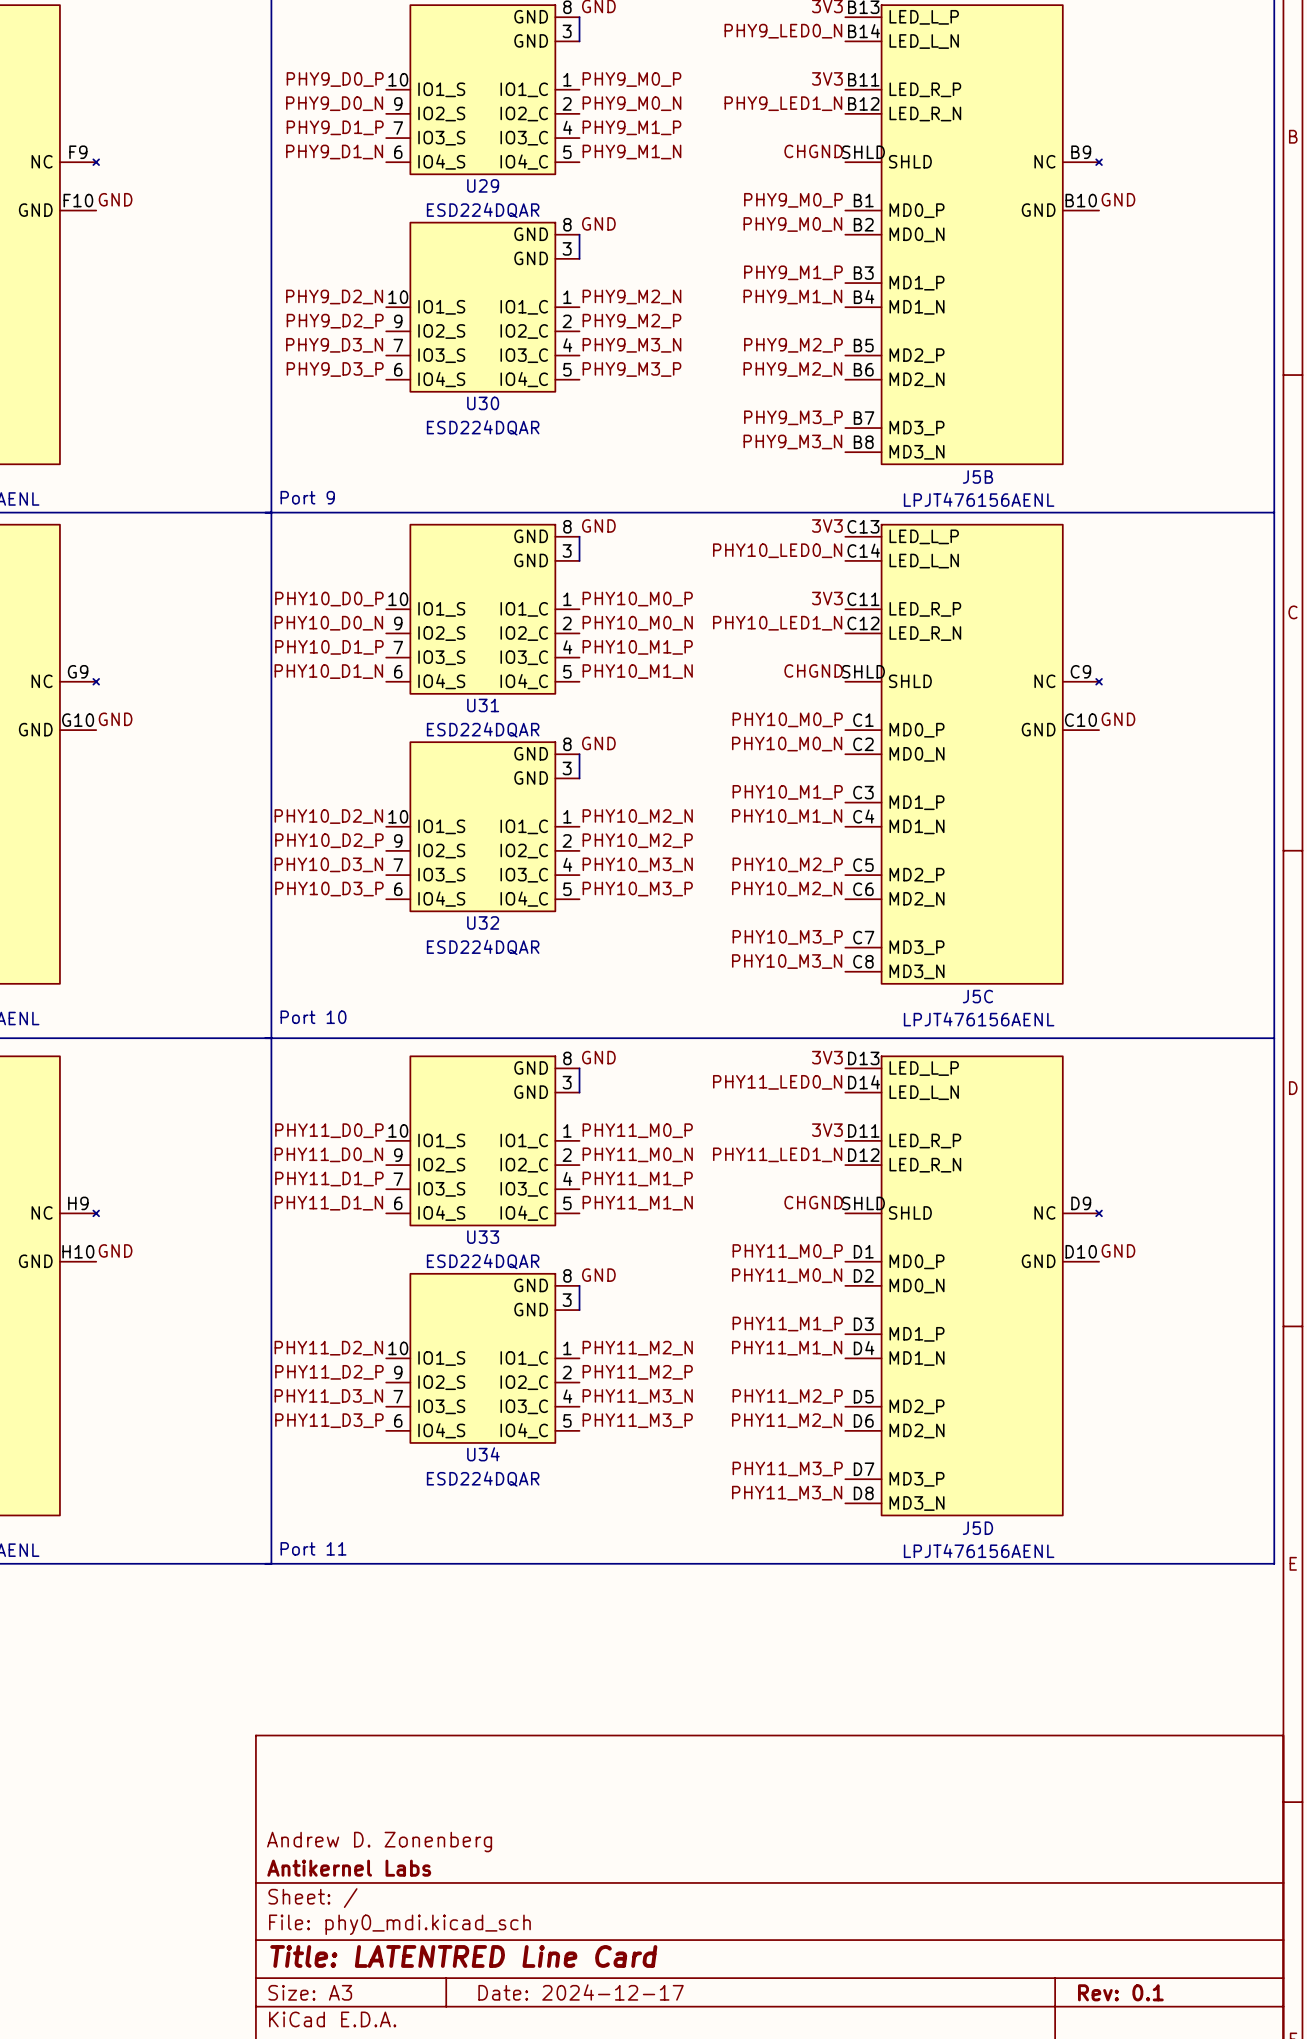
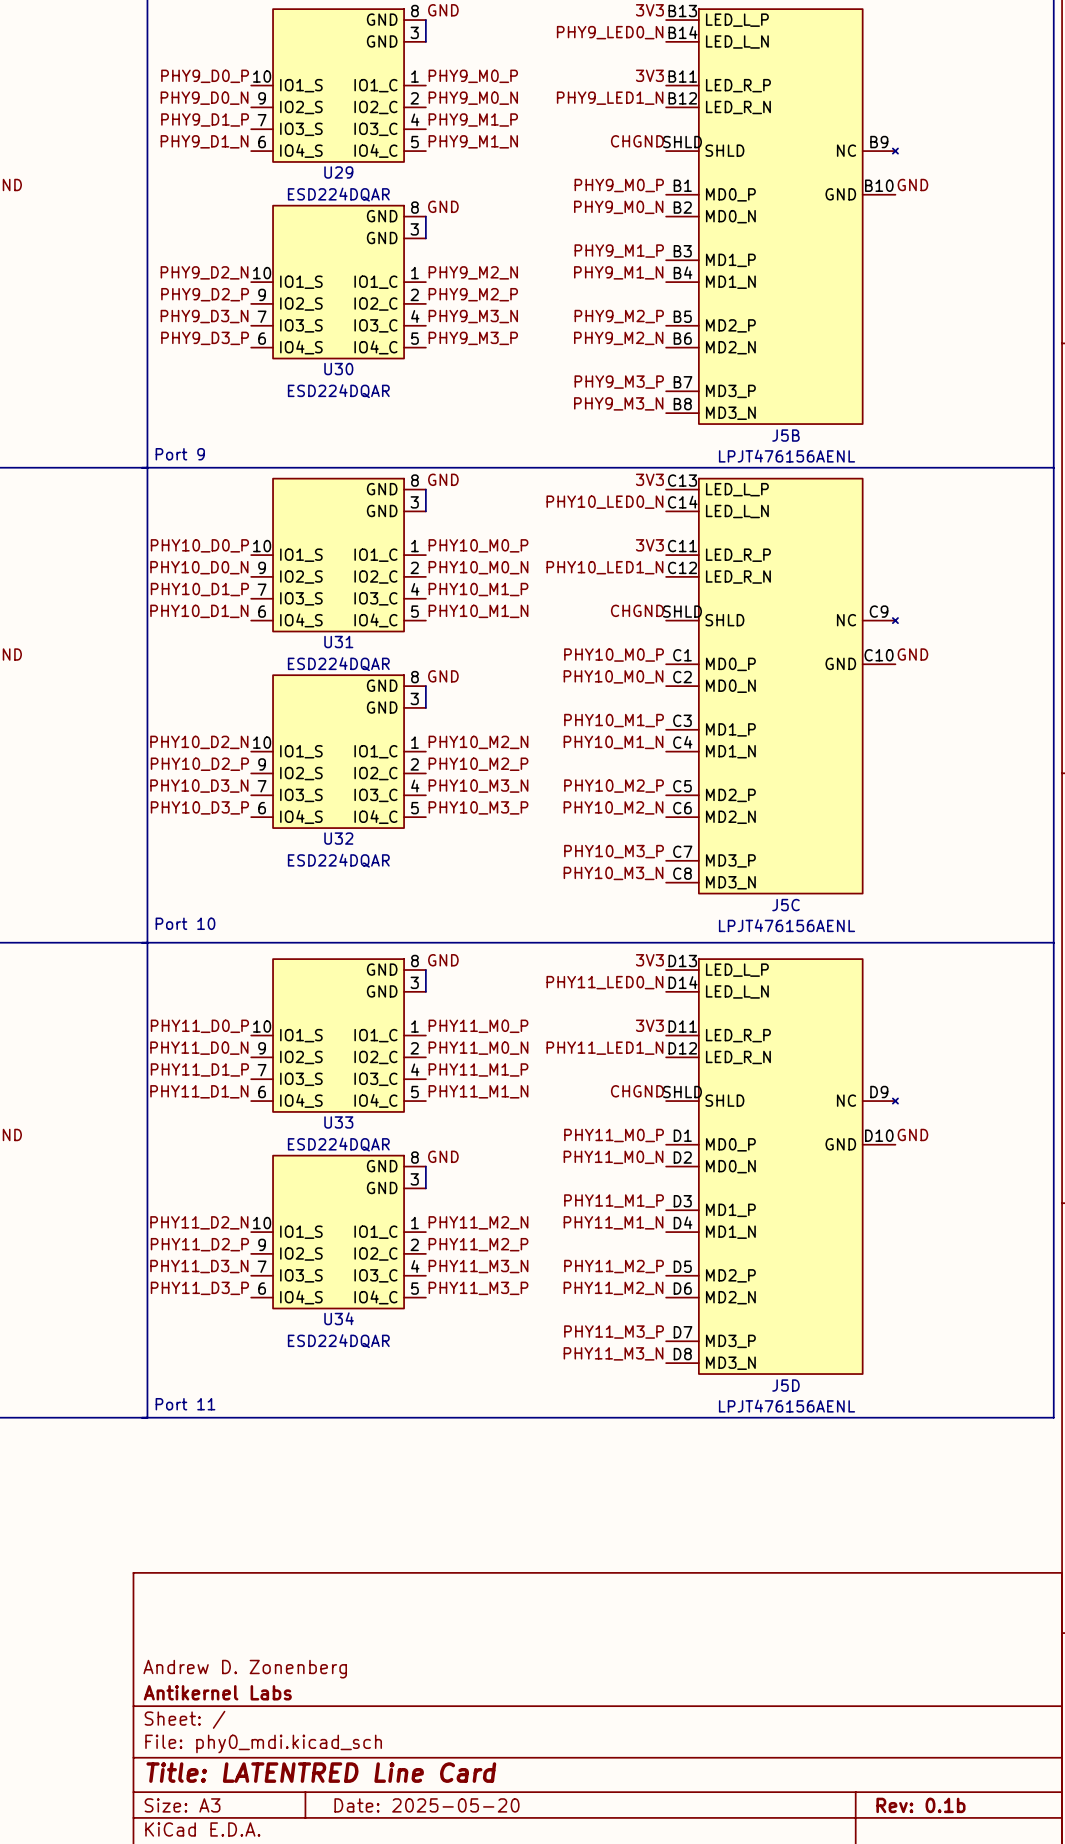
title block: Date: 2024-12-17 (581, 1992) -> Date: 2025-05-20 (426, 1805)
title block: Rev: 0.1 (1120, 1992) -> Rev: 0.1b (920, 1805)

